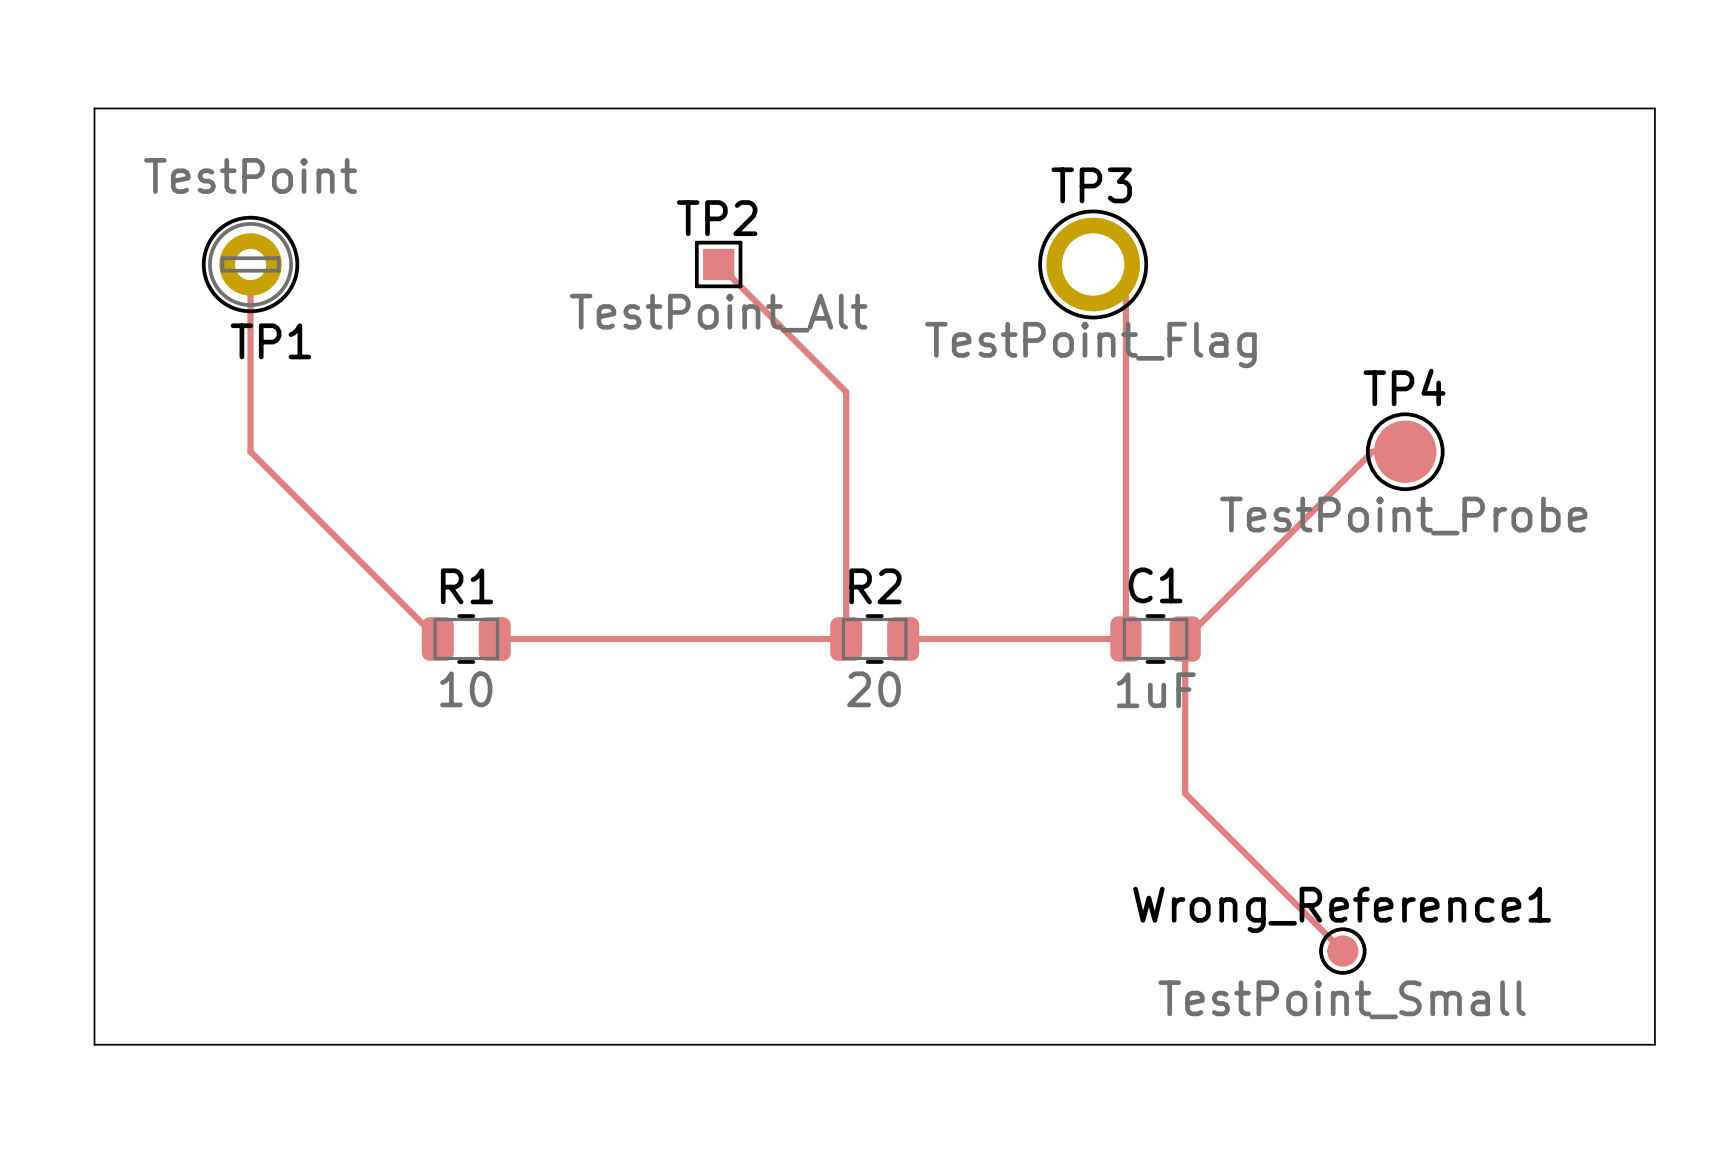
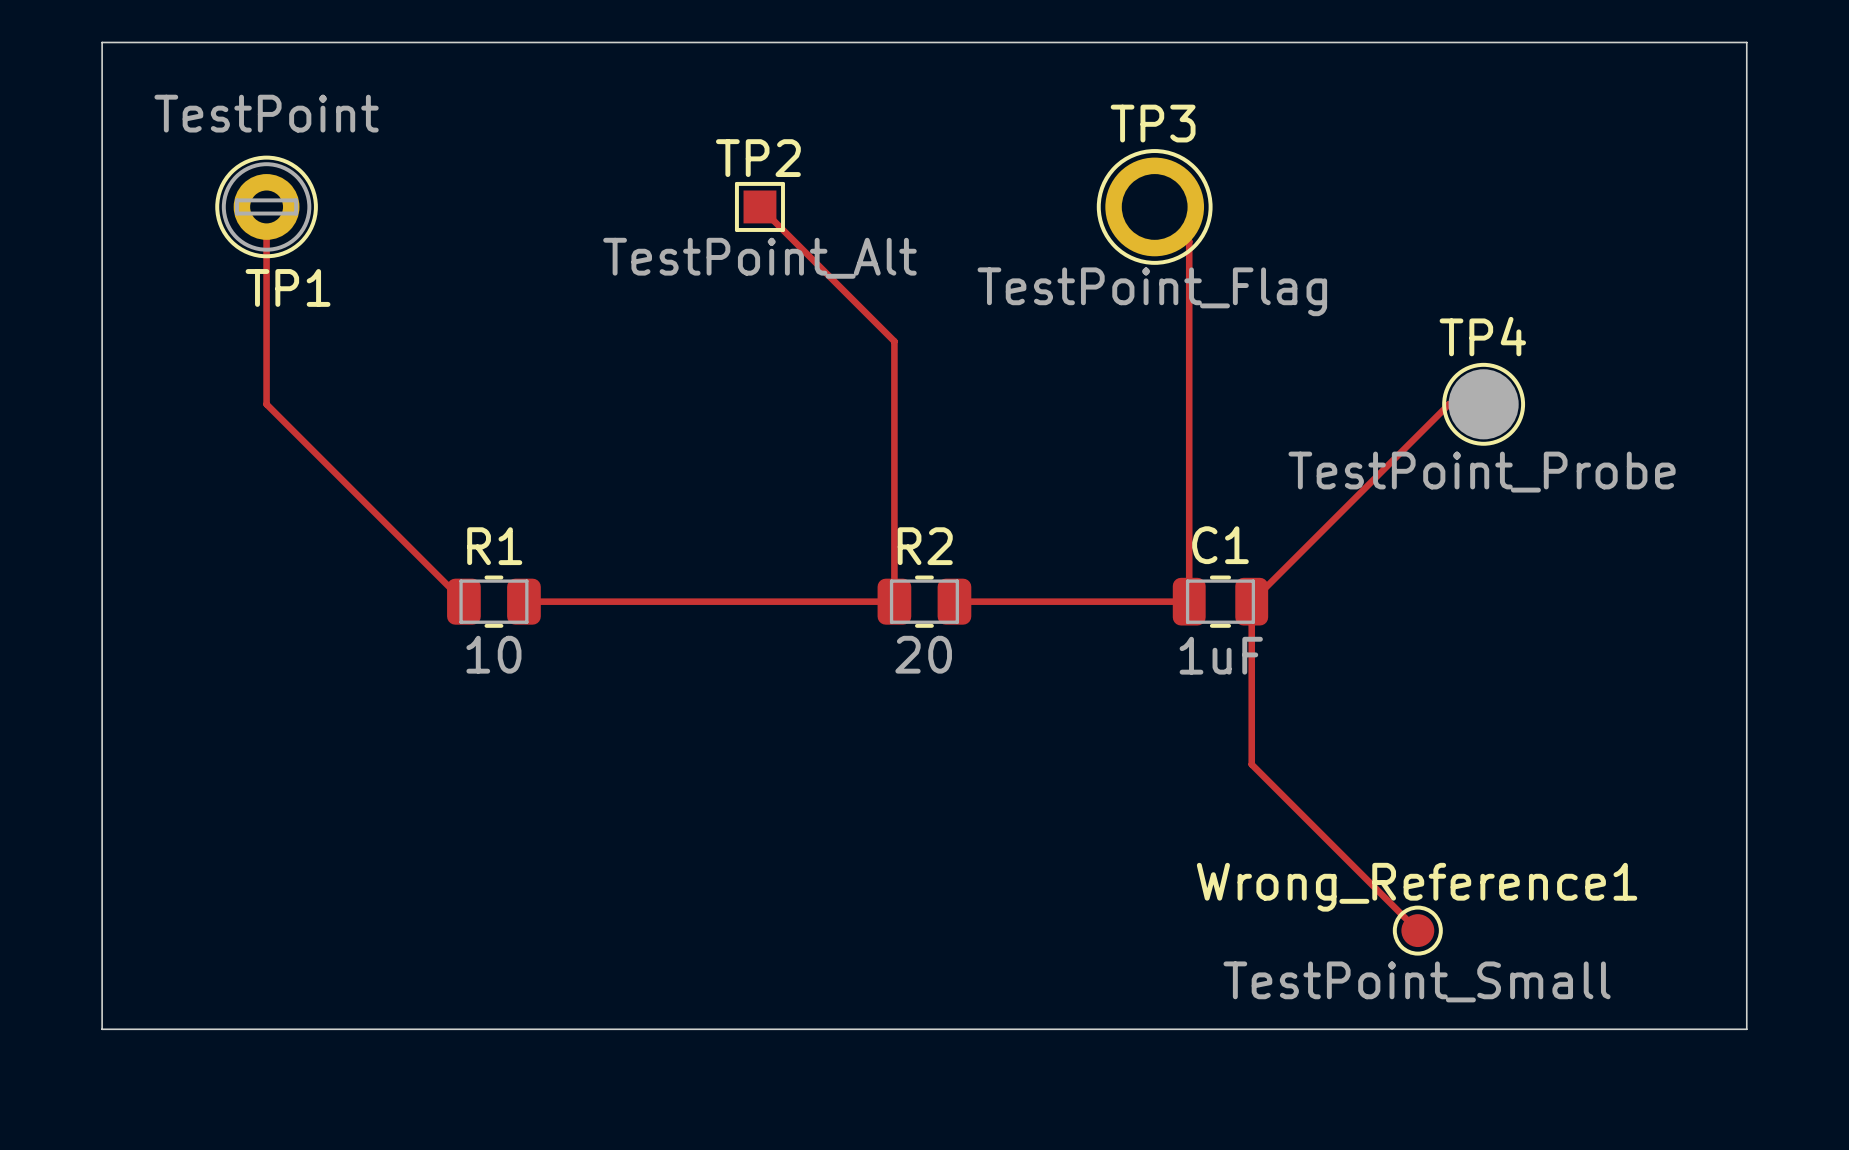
TP4 footprint: [1365, 412, 1445, 492] -> [1442, 362, 1526, 446]

